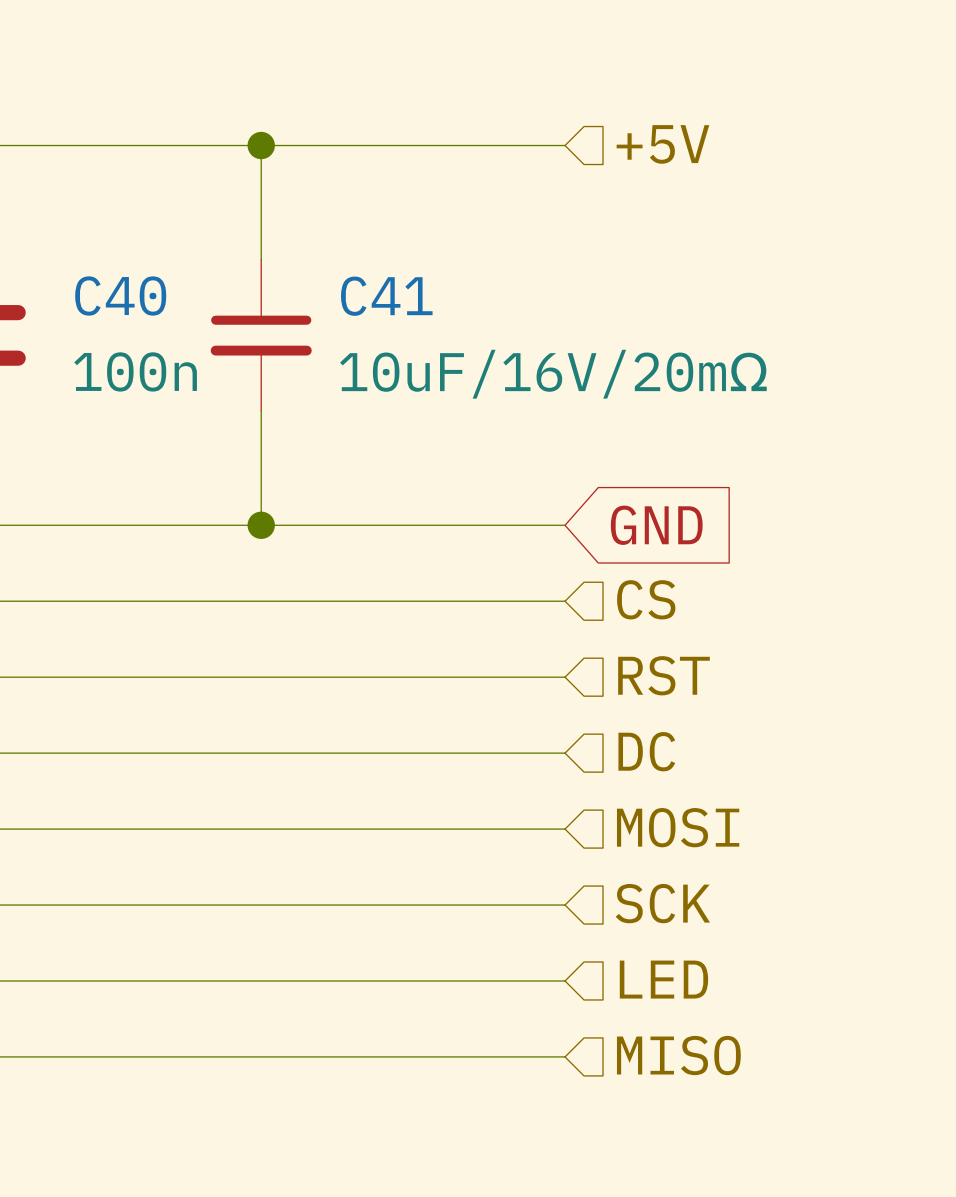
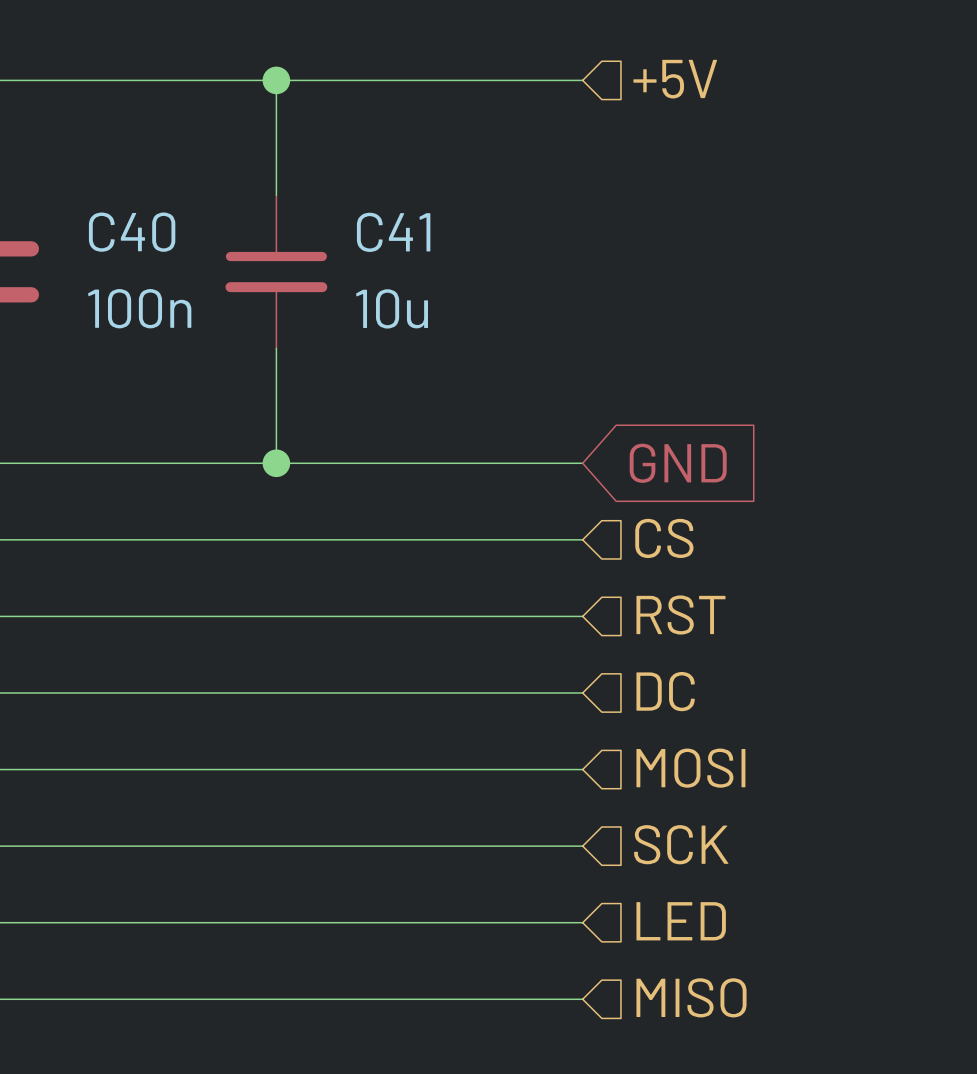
C41 text: 10uF/16V/20mΩ (553, 374) -> 10u (392, 308)

